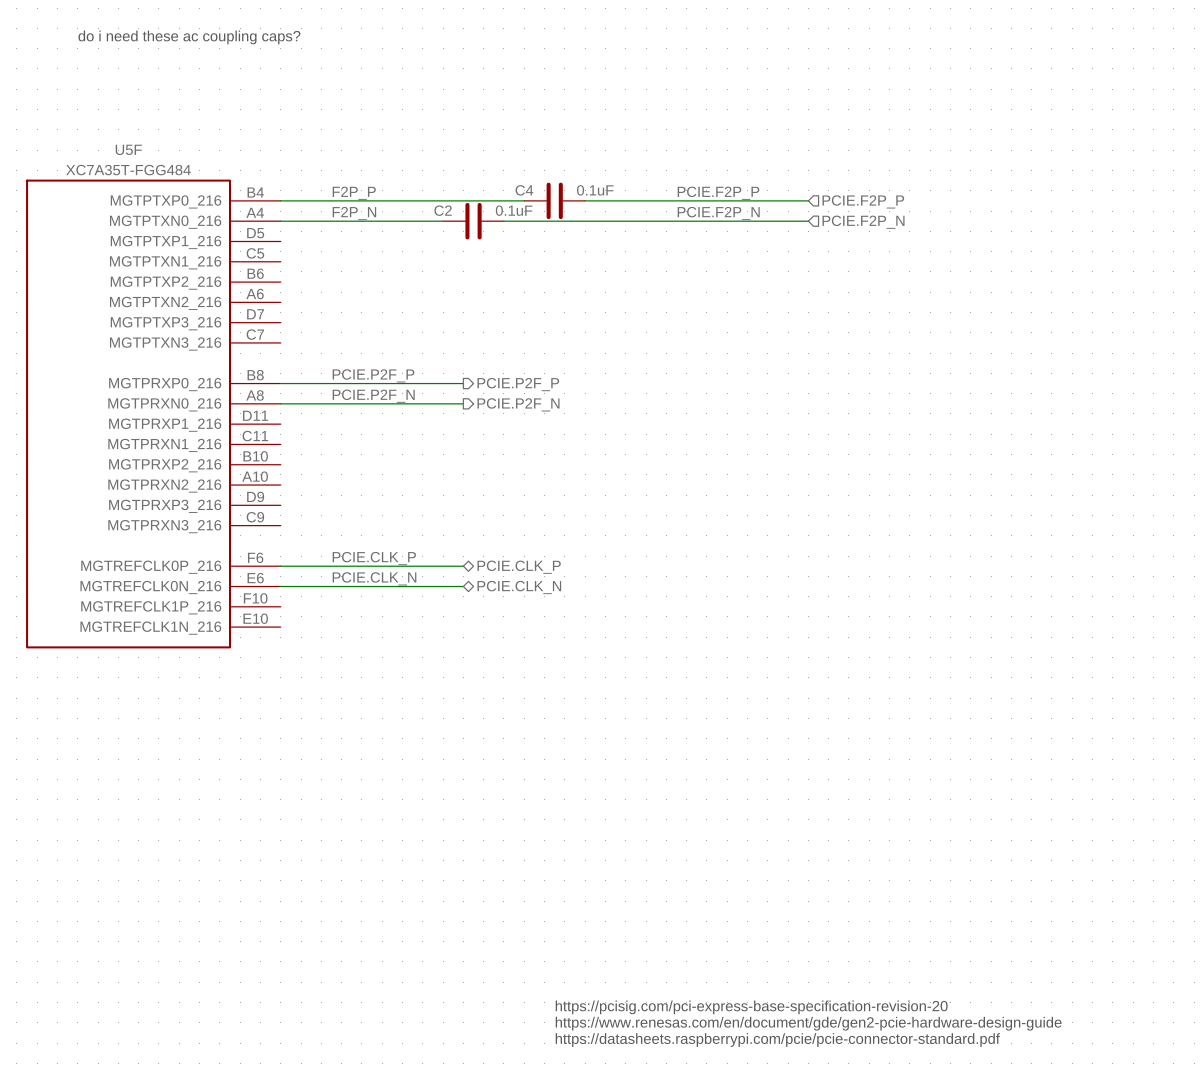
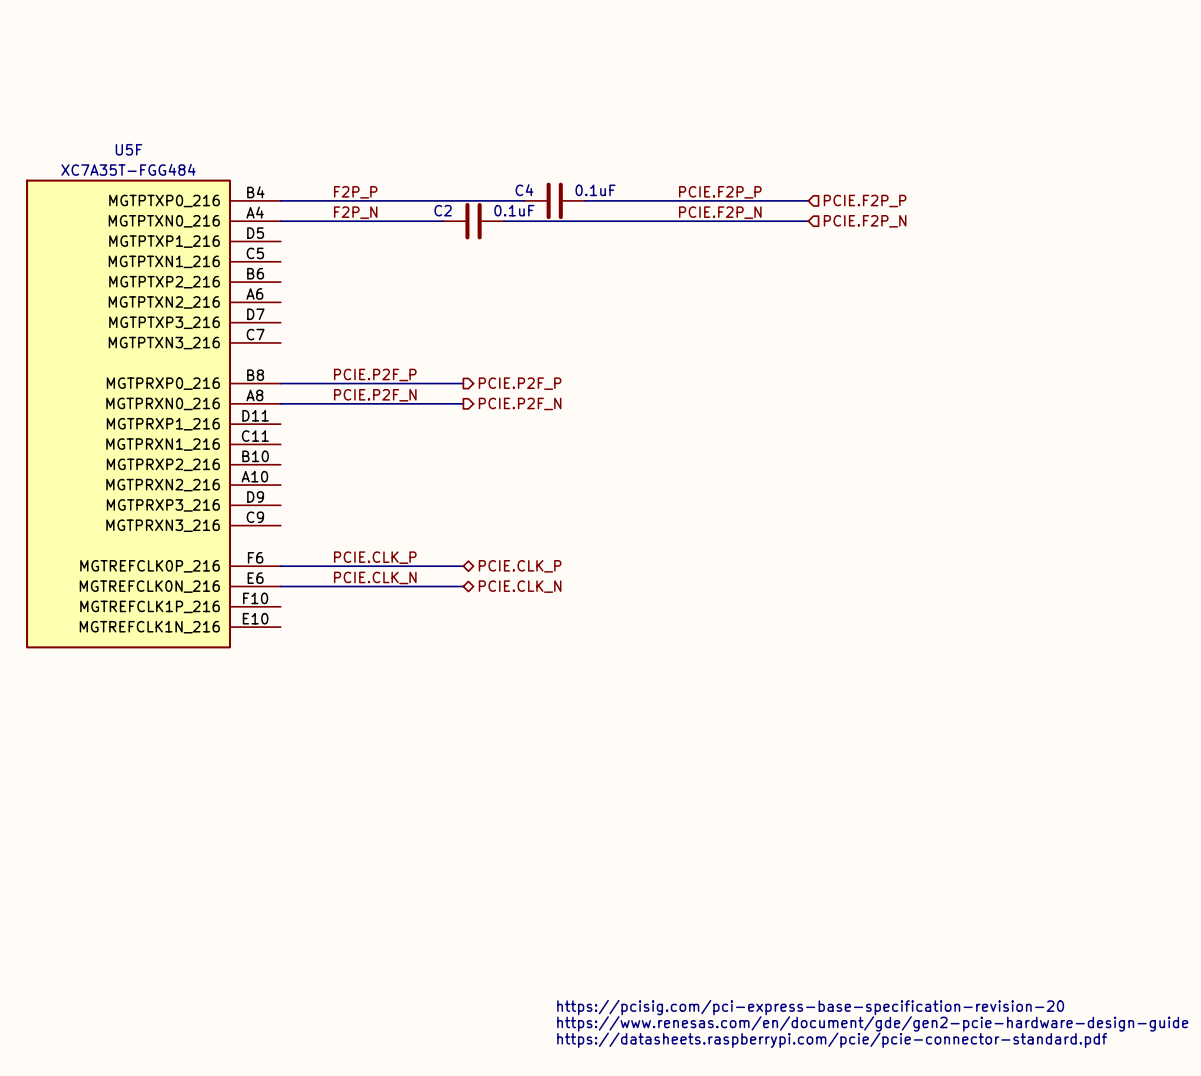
text: do i need these ac coupling caps? (189, 37) -> none

